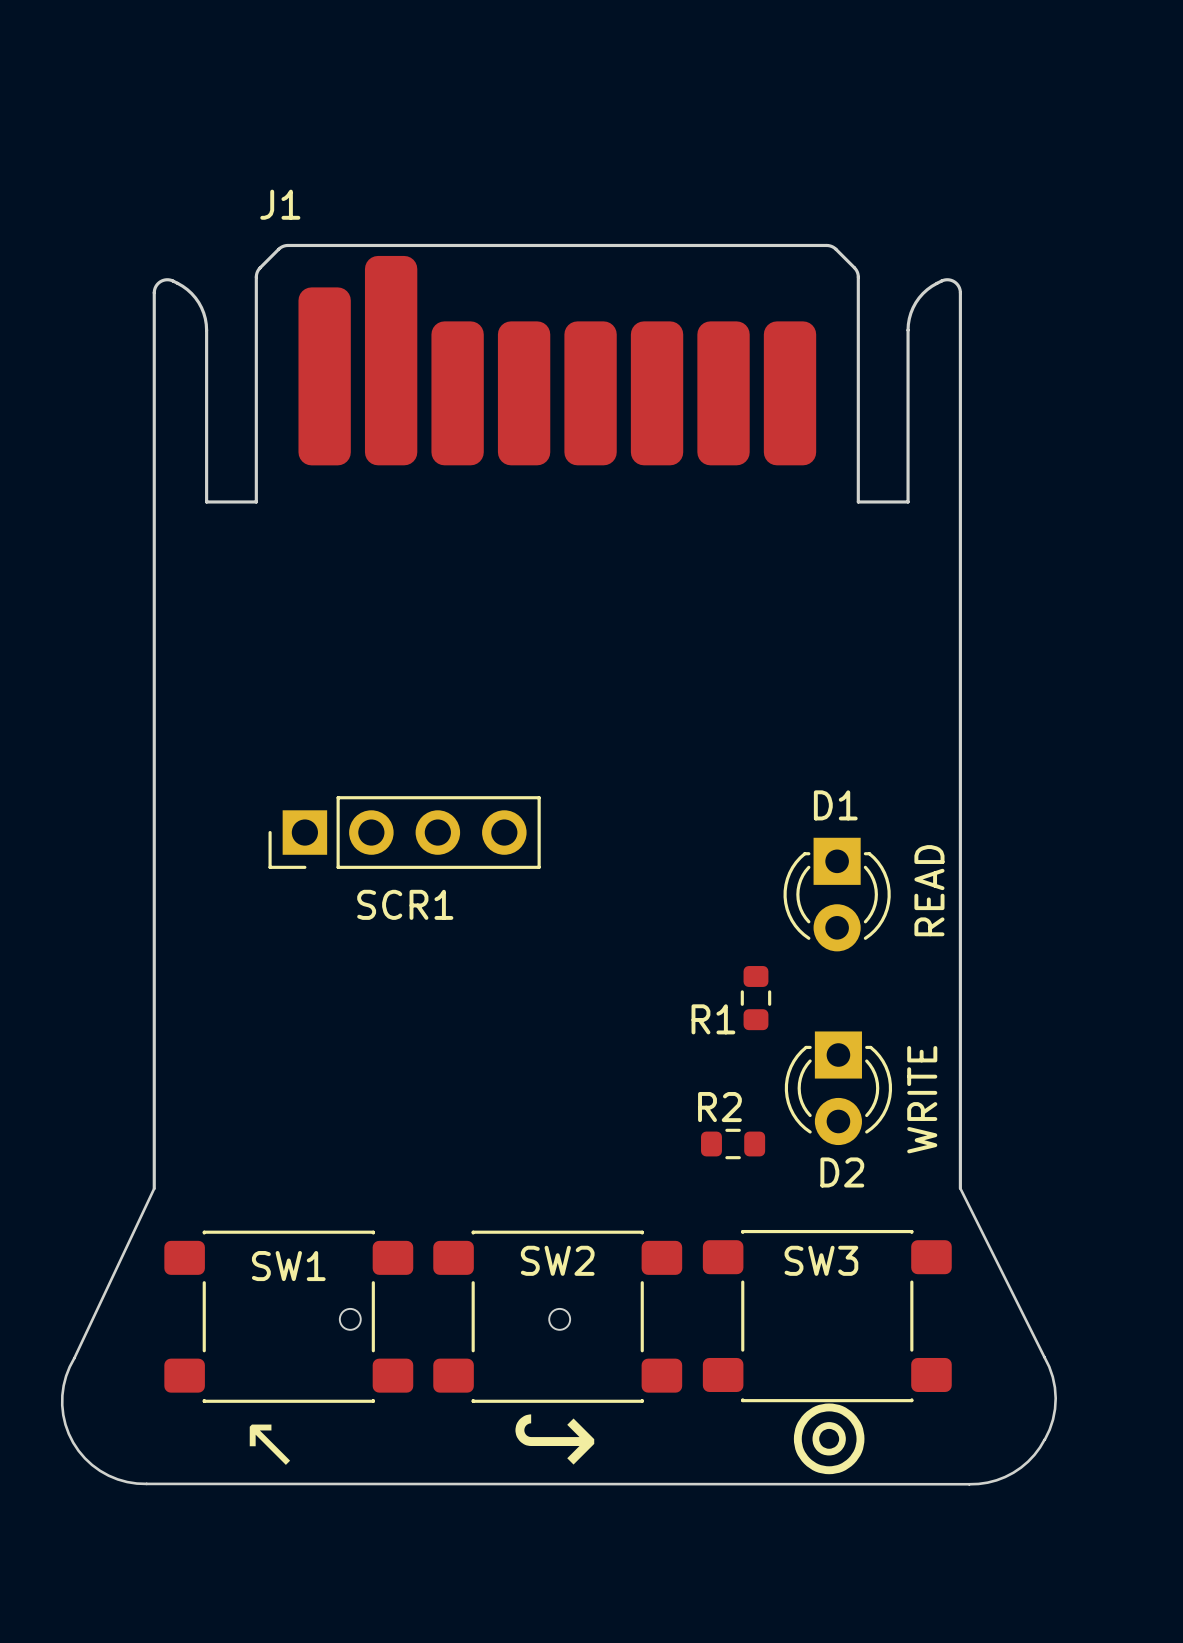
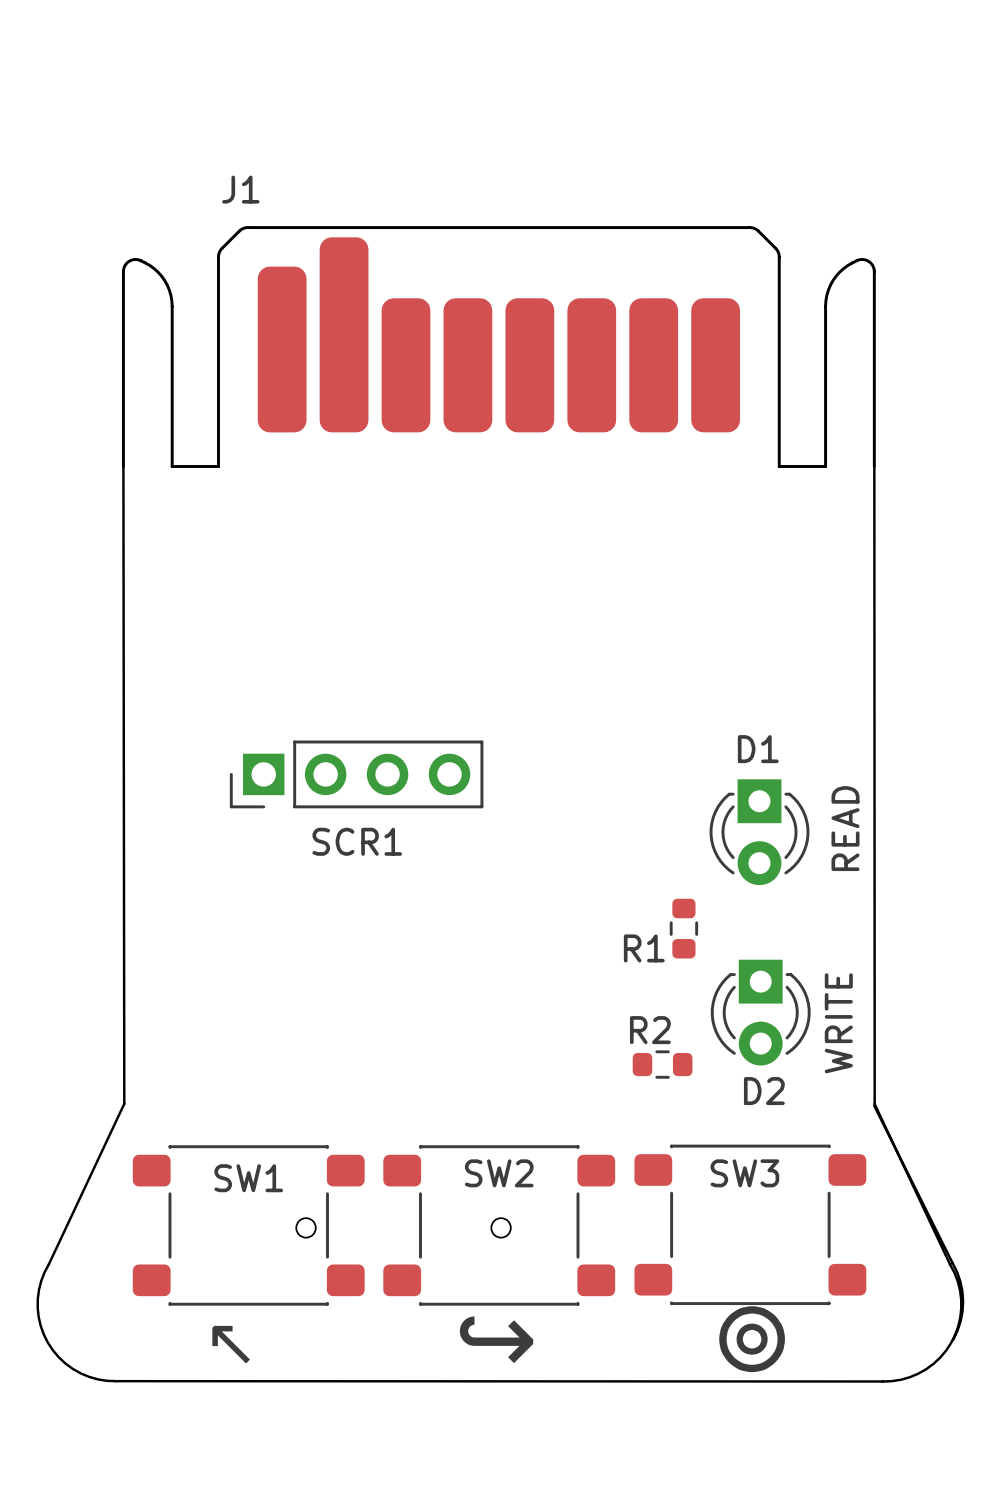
J1 footprint: [152, 243, 962, 1191] -> [121, 226, 876, 468]
board edge: (154, 1188) (74, 1358) -> (123, 466) (124, 1103) (48, 1264)
board edge: (1044, 1439) (1028, 1461) (1013, 1472) (996, 1480) (969, 1484) -> (874, 466) (874, 1104) (954, 1272) (959, 1290) (961, 1308) (955, 1334) (946, 1350) (933, 1363) (909, 1377) (882, 1381)

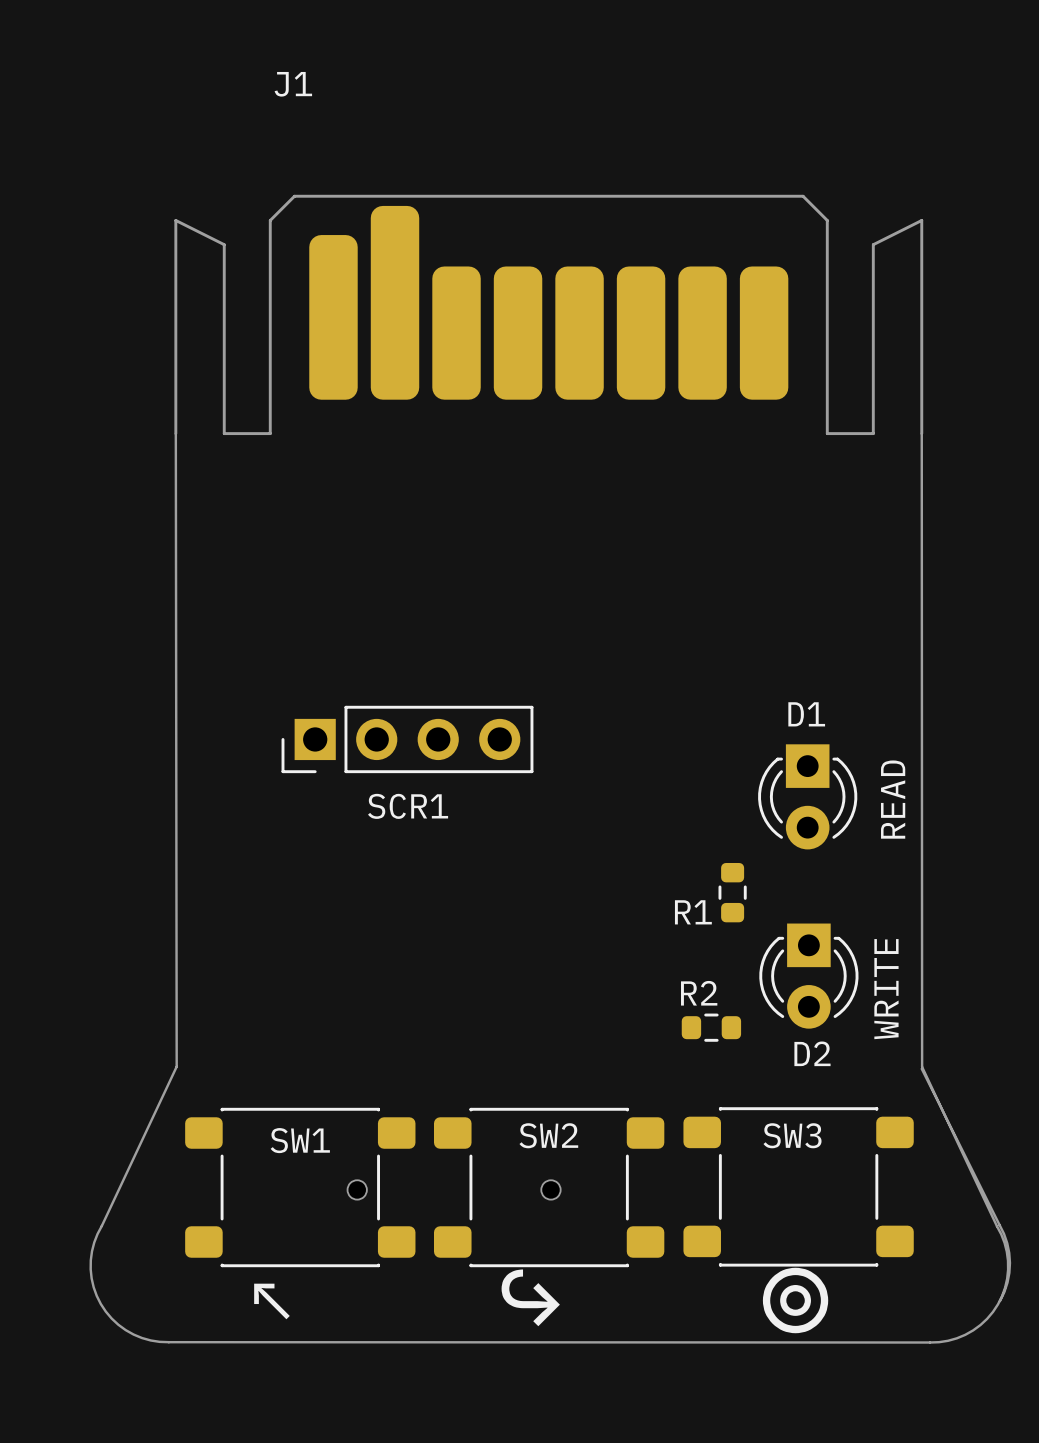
J1 name position: J1 (240, 189) -> J1 (293, 84)
J1 footprint: [121, 226, 876, 468] -> [174, 194, 924, 436]

